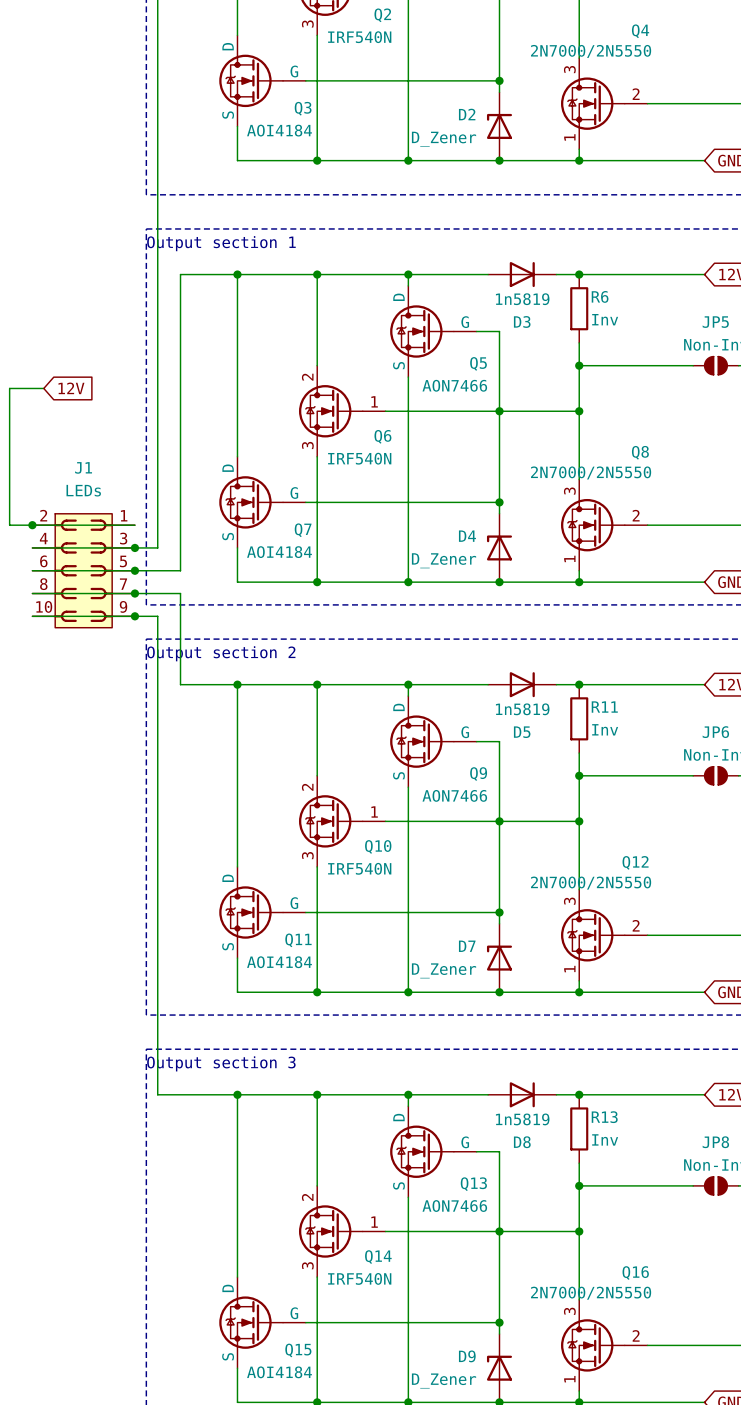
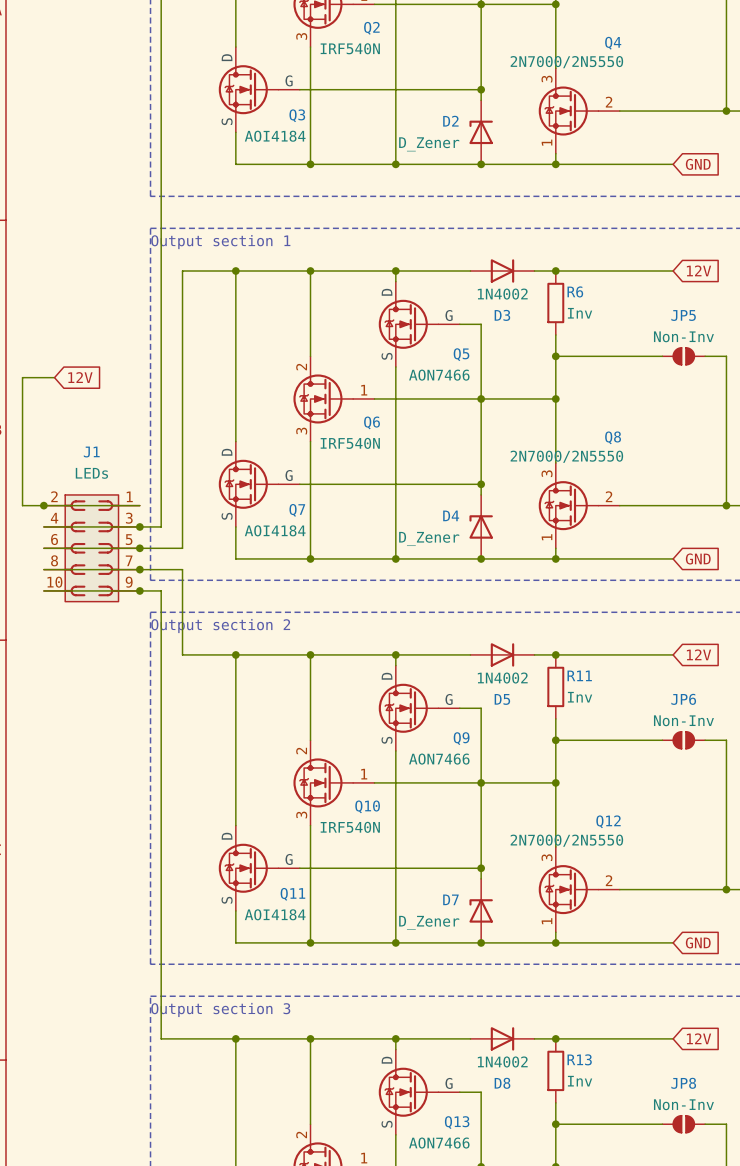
D3 value: 1n5819 (522, 299) -> 1N4002 (502, 294)
D5 value: 1n5819 (522, 709) -> 1N4002 (502, 678)
D8 value: 1n5819 (522, 1119) -> 1N4002 (502, 1061)

